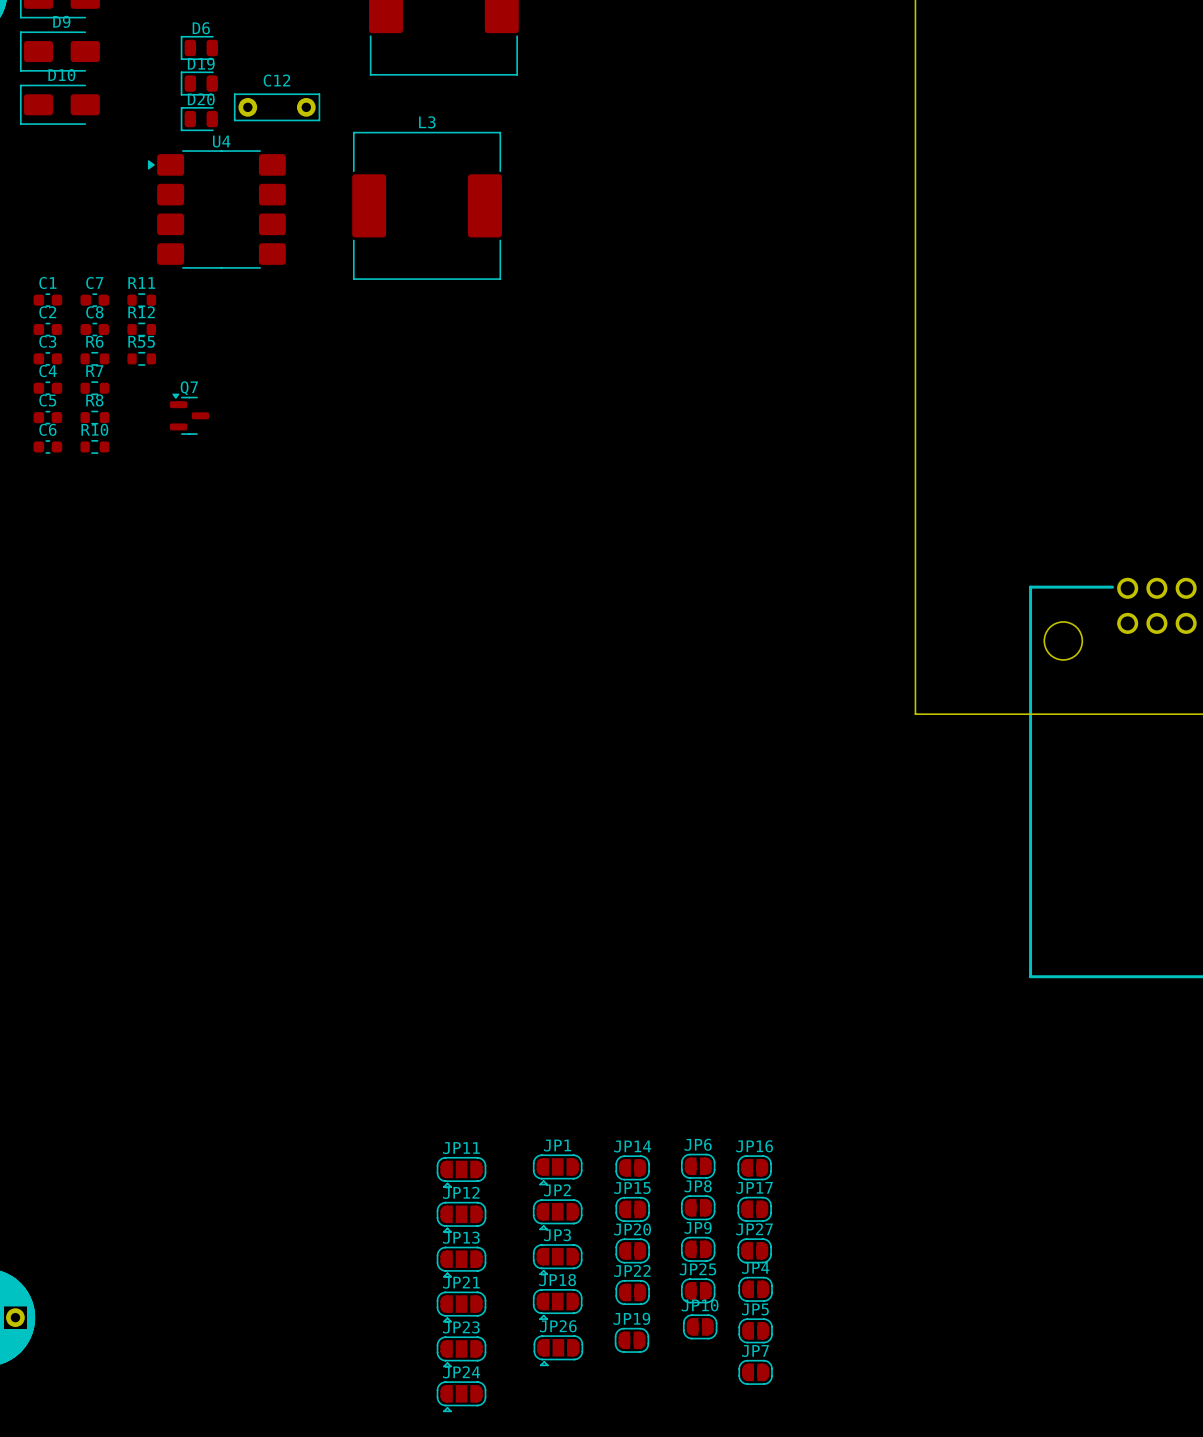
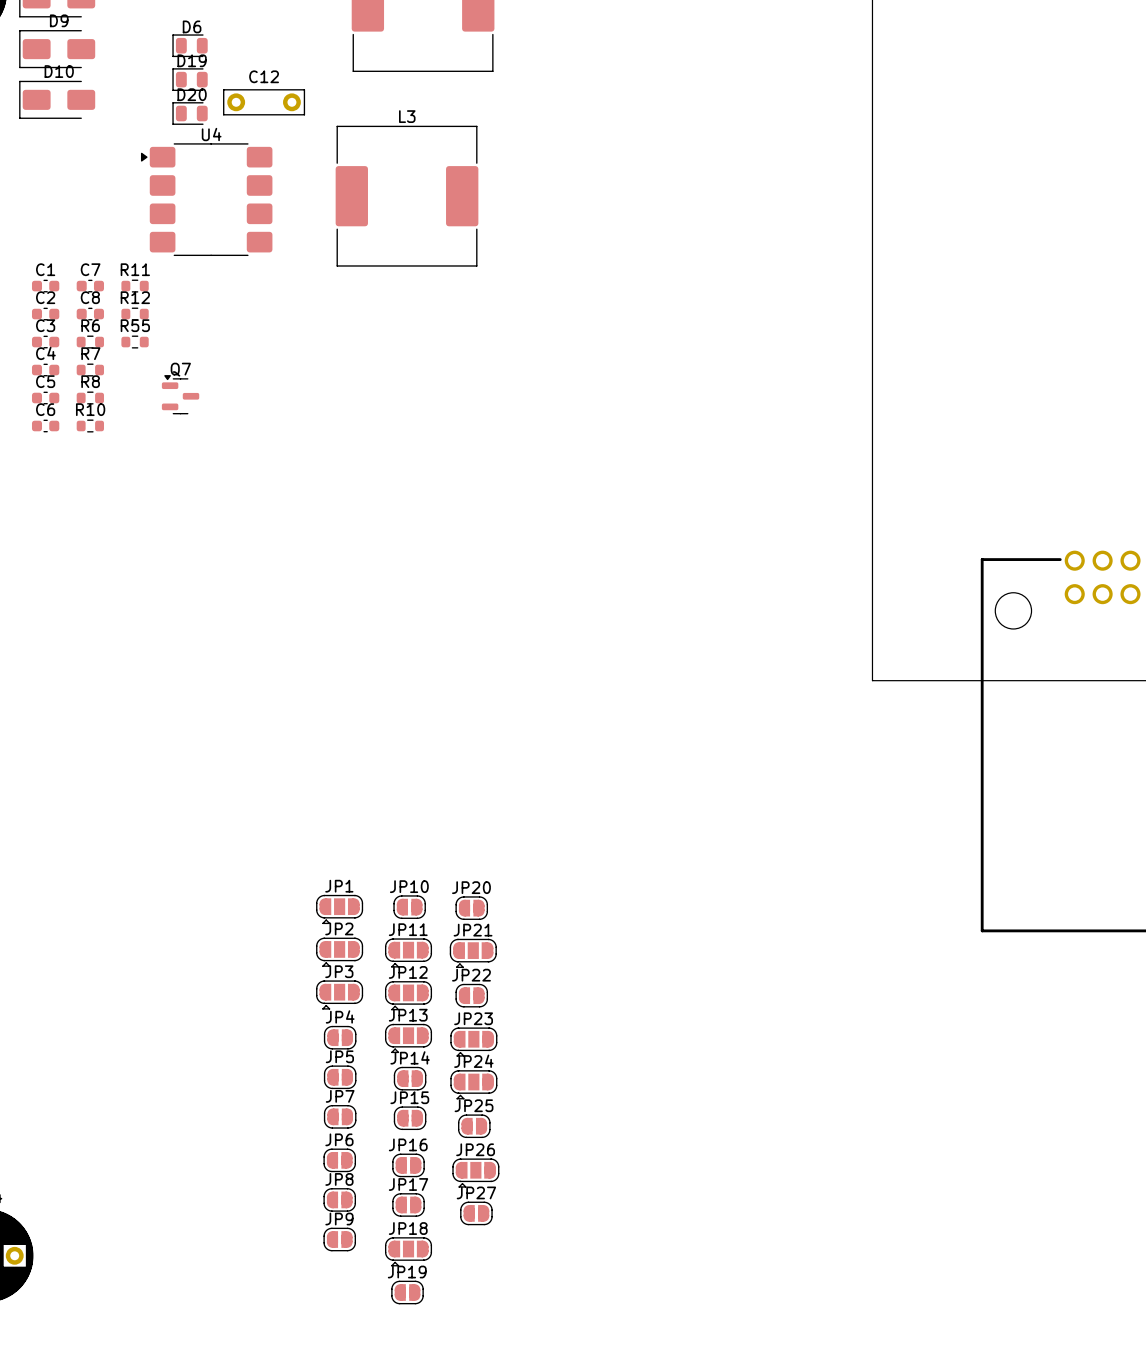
JP6 position: (698, 1166) -> (339, 1160)
JP14 position: (632, 1167) -> (410, 1078)
JP16 position: (754, 1167) -> (408, 1165)
JP1 position: (557, 1169) -> (339, 909)
JP11 position: (461, 1172) -> (408, 952)
JP8 position: (698, 1207) -> (339, 1199)
JP15 position: (632, 1209) -> (410, 1118)
JP17 position: (754, 1209) -> (408, 1204)
JP2 position: (557, 1214) -> (339, 952)
JP12 position: (461, 1217) -> (408, 995)
JP9 position: (698, 1249) -> (339, 1239)
JP20 position: (632, 1250) -> (471, 908)
JP27 position: (754, 1250) -> (476, 1213)
JP3 position: (557, 1259) -> (339, 994)
JP13 position: (461, 1262) -> (408, 1038)
JP4 position: (755, 1289) -> (340, 1037)
JP25 position: (698, 1290) -> (474, 1126)
JP22 position: (632, 1292) -> (471, 995)
JP18 position: (557, 1304) -> (408, 1251)
JP21 position: (461, 1306) -> (473, 953)
JP10 position: (700, 1326) -> (409, 907)
JP5 position: (755, 1330) -> (340, 1077)
JP19 position: (631, 1340) -> (407, 1292)
JP26 position: (558, 1350) -> (475, 1173)
JP23 position: (461, 1351) -> (473, 1042)
JP7 position: (755, 1372) -> (340, 1116)
JP24 position: (461, 1396) -> (473, 1084)

